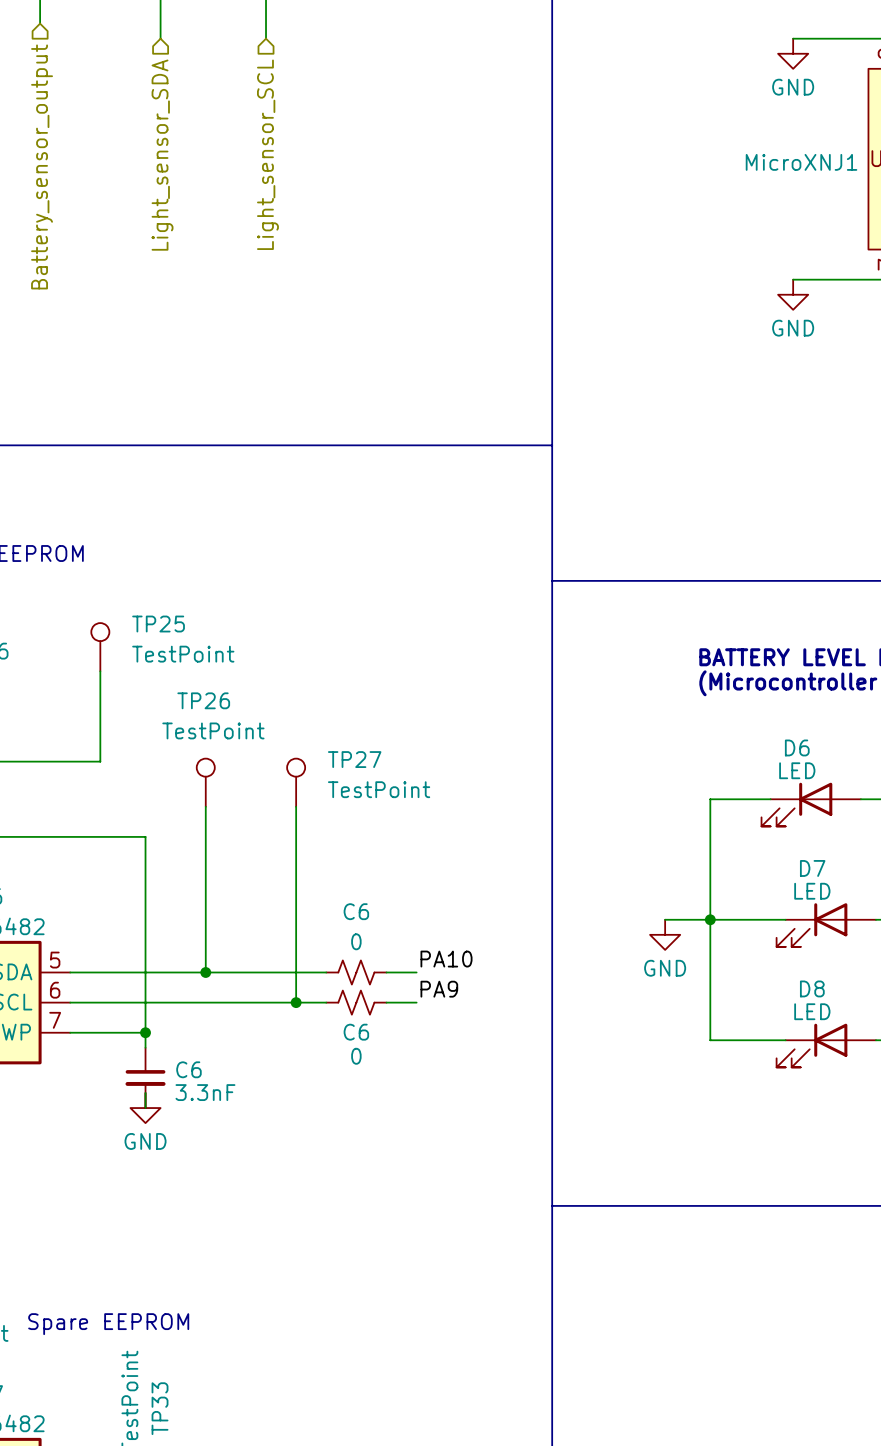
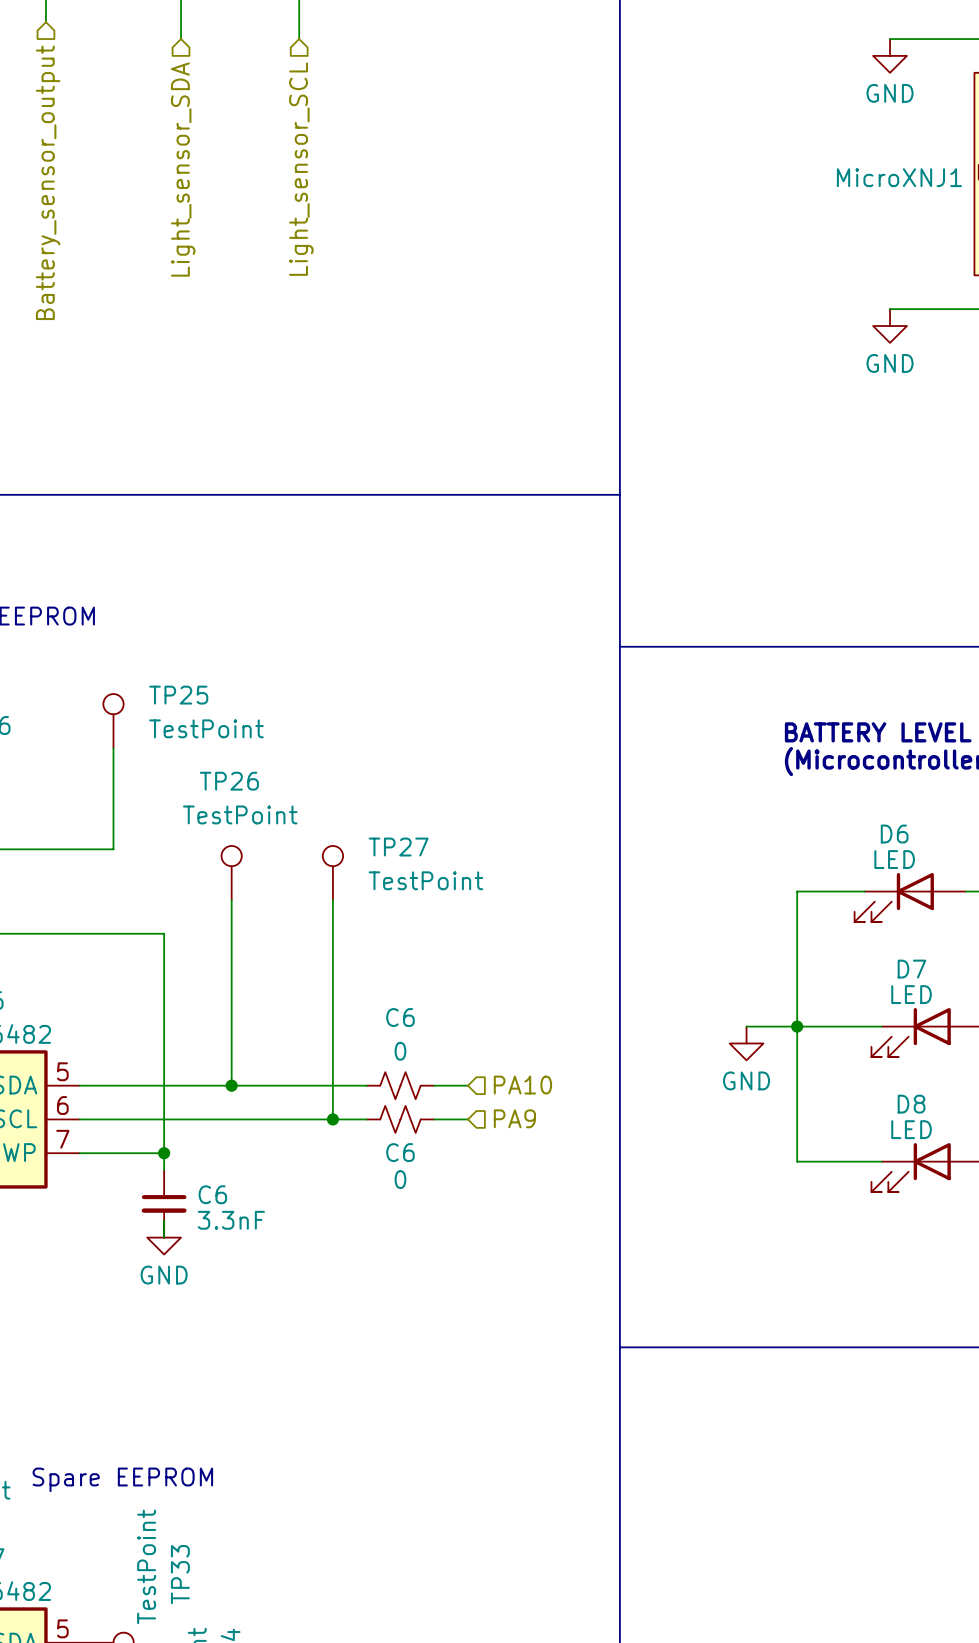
label: PA10 (446, 959) -> none
hierarchical label: none -> PA10 (522, 1085)
label: PA9 (439, 989) -> none
hierarchical label: none -> PA9 (514, 1118)

